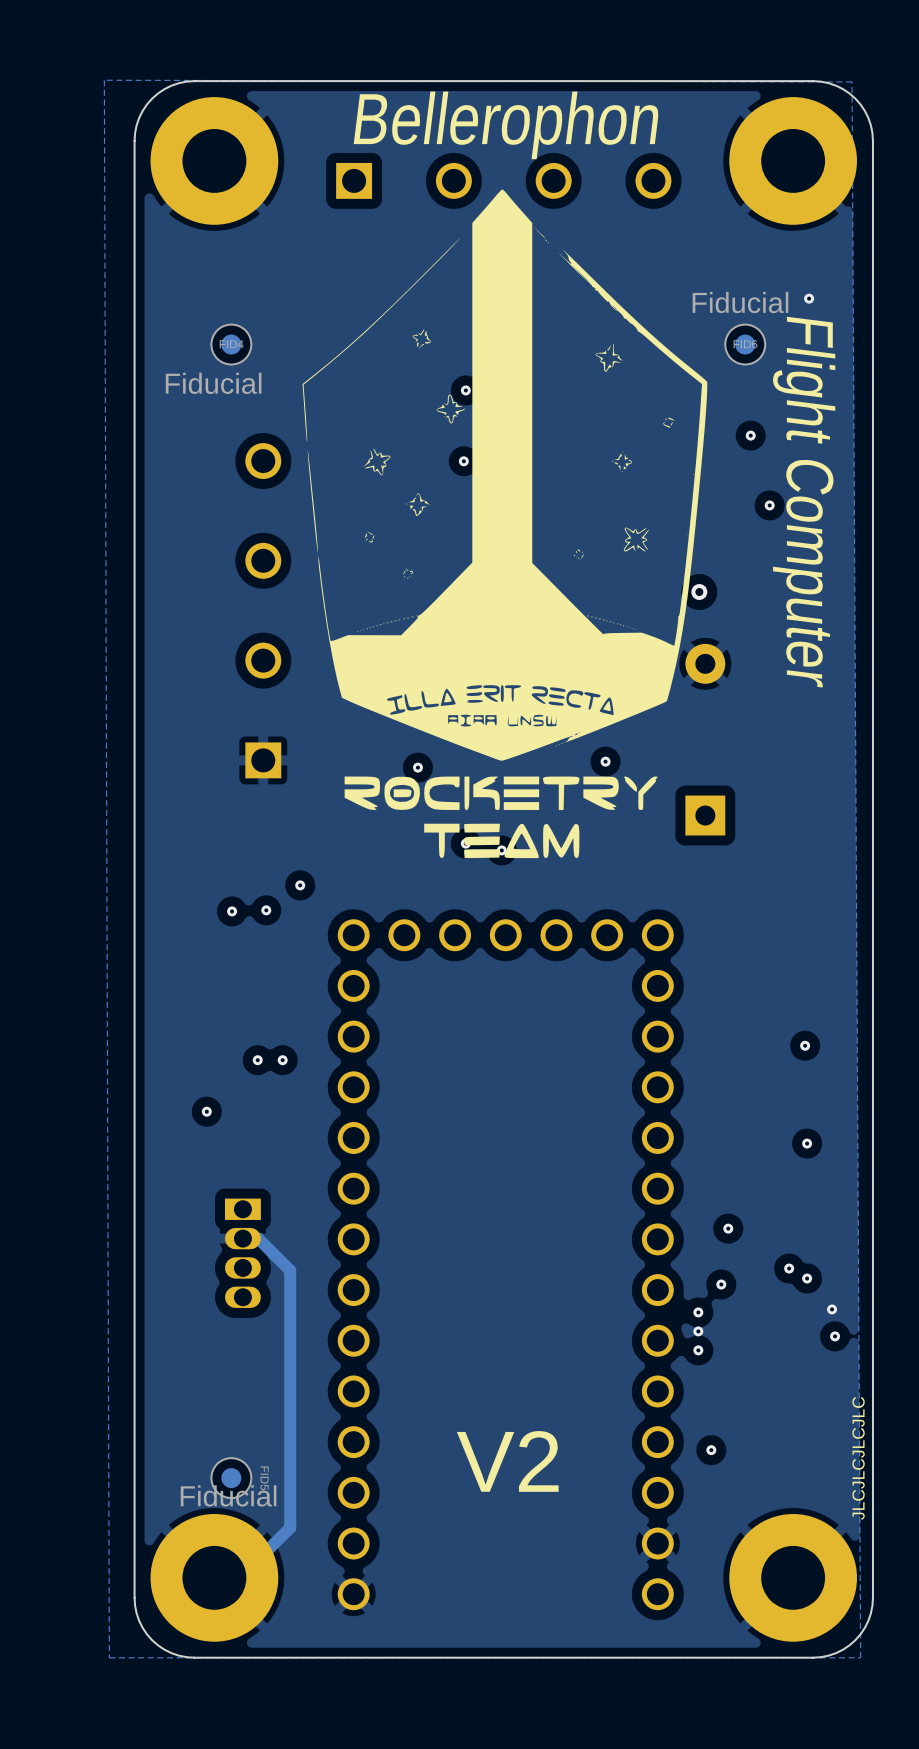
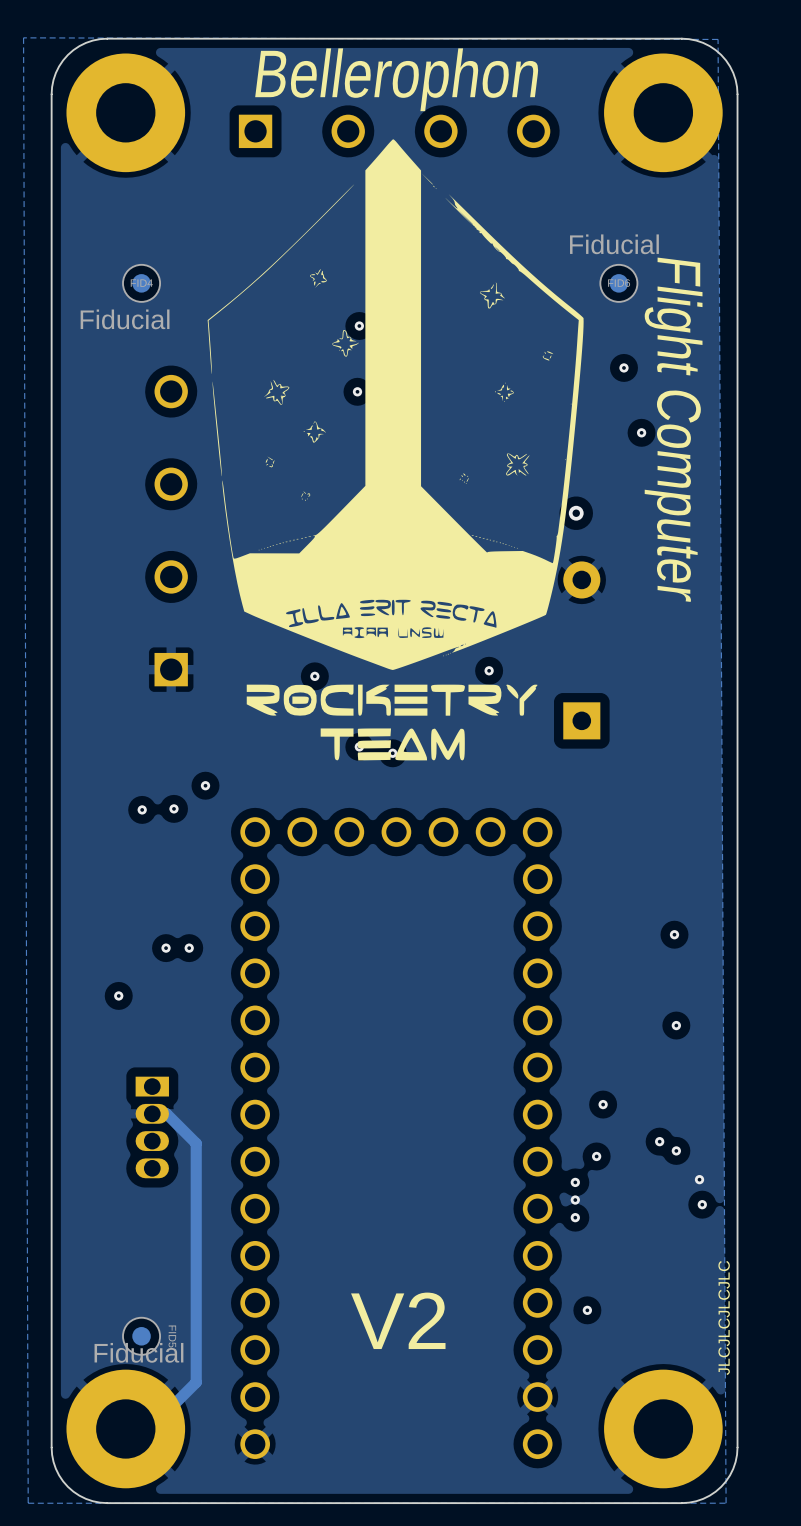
via: (809, 298) -> none

